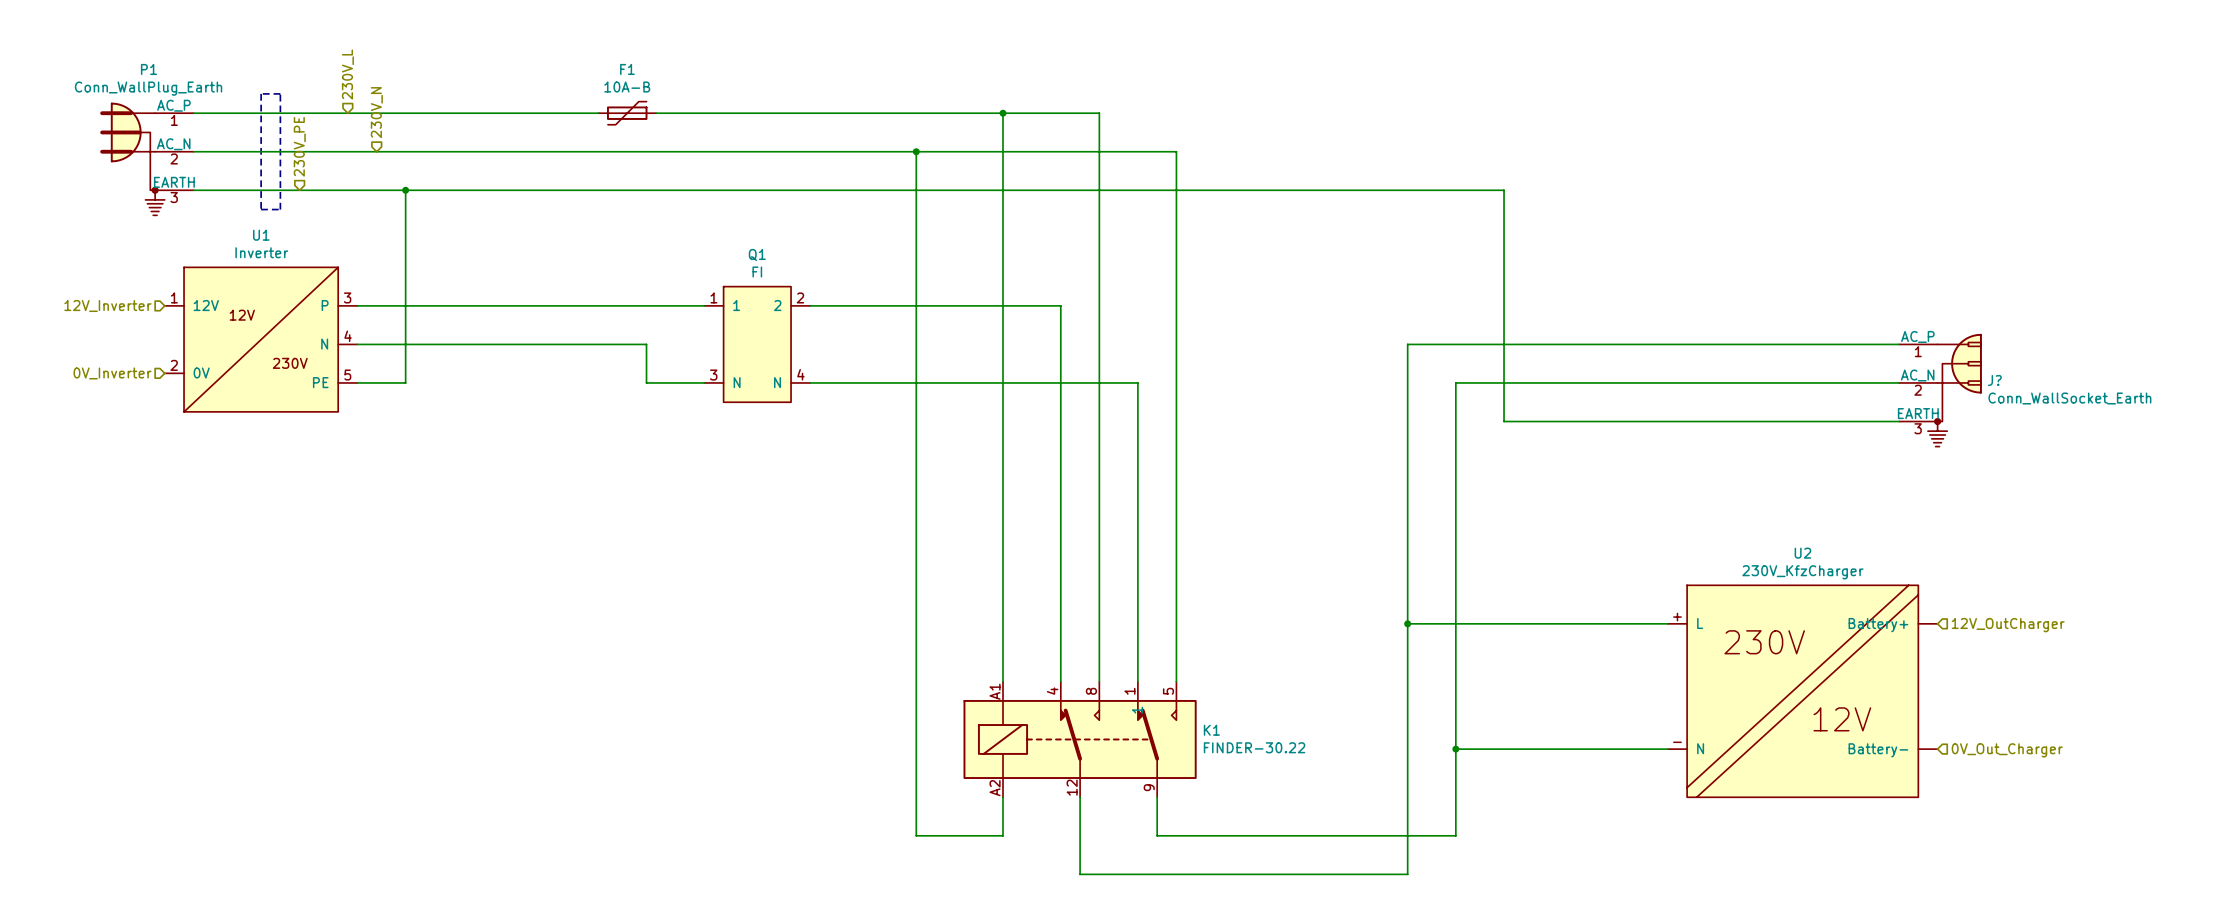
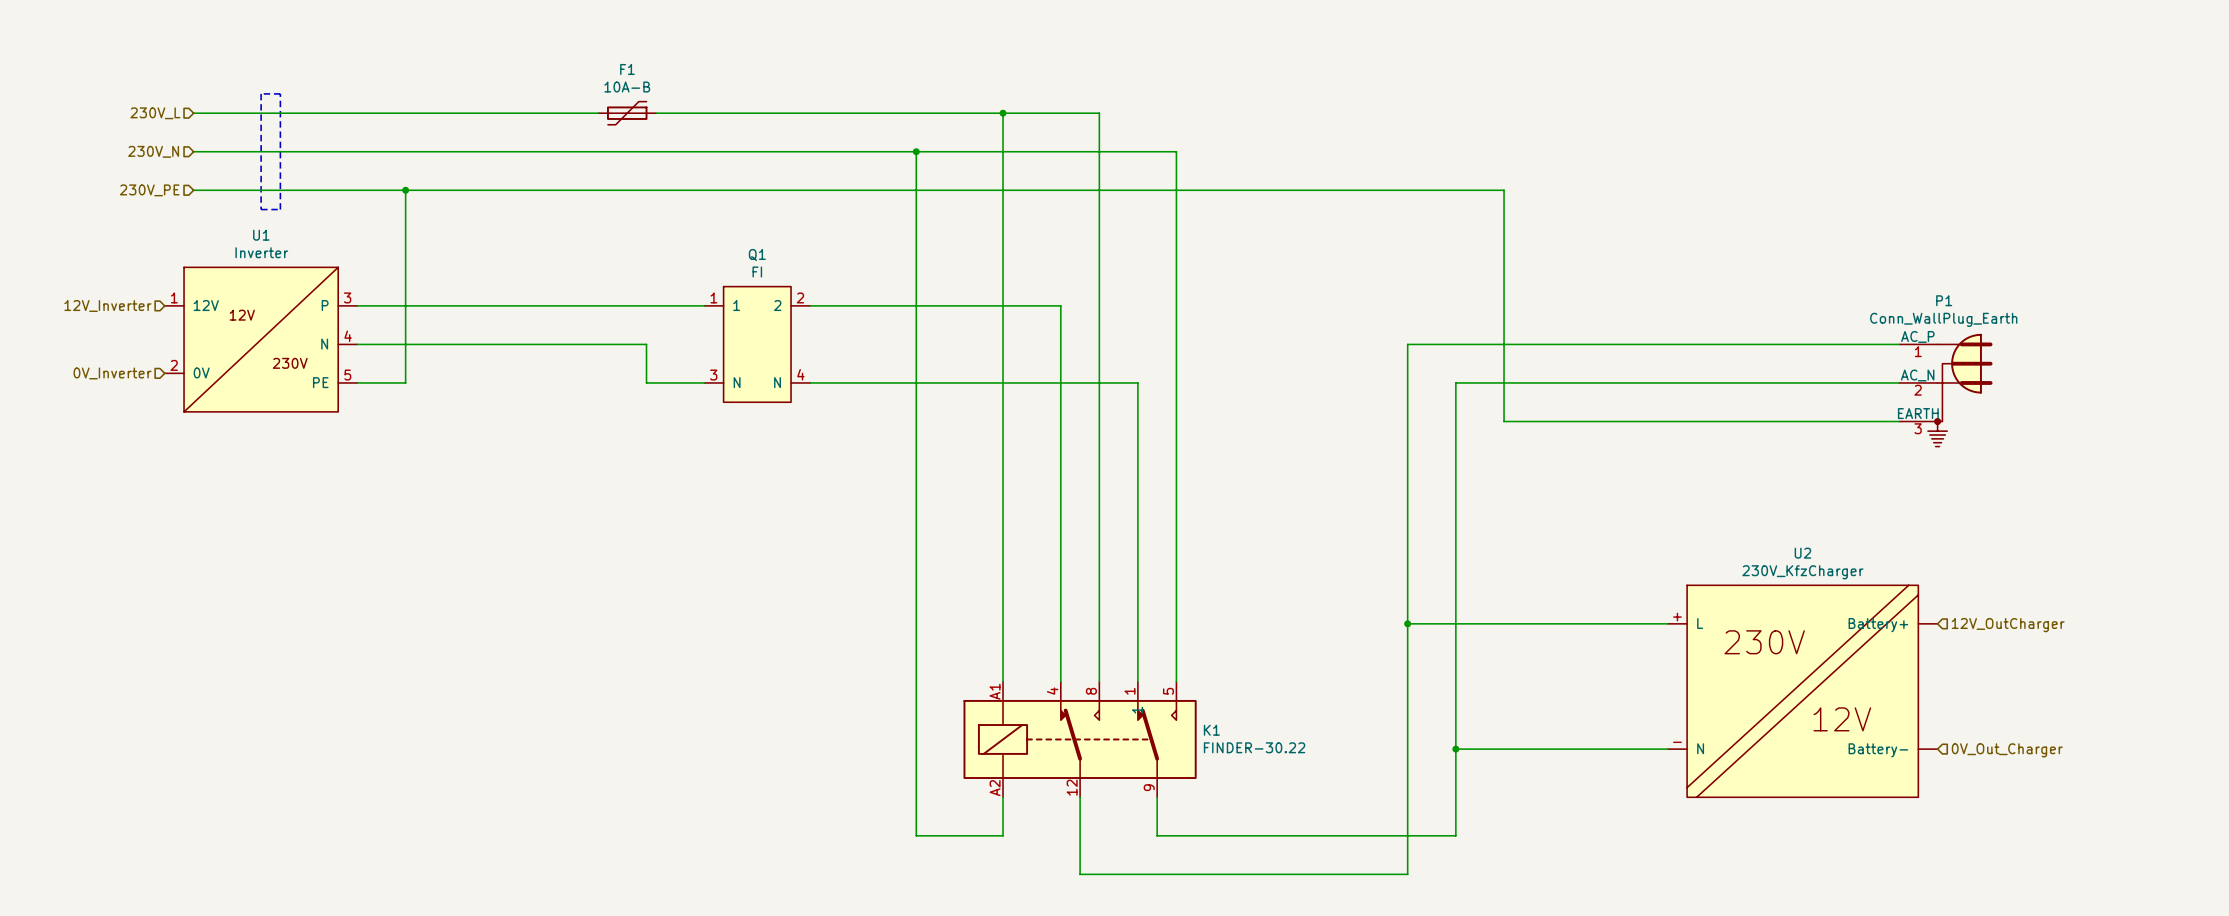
hierarchical label rotation: 0° (347, 74) -> 90° counterclockwise (155, 113)
hierarchical label position: 230V_L (347, 74) -> 230V_L (155, 113)
hierarchical label: 230V_N (376, 112) -> none
hierarchical label rotation: 0° (299, 146) -> 90° counterclockwise (149, 190)
hierarchical label position: 230V_PE (299, 146) -> 230V_PE (149, 190)
hierarchical label: none -> 230V_N (153, 151)
P1 flip: as is (132, 159) -> left-right (1959, 390)
P1 position: (146, 159) -> (1945, 390)
J?: Conn_WallSocket_Earth (1940, 390) -> none

